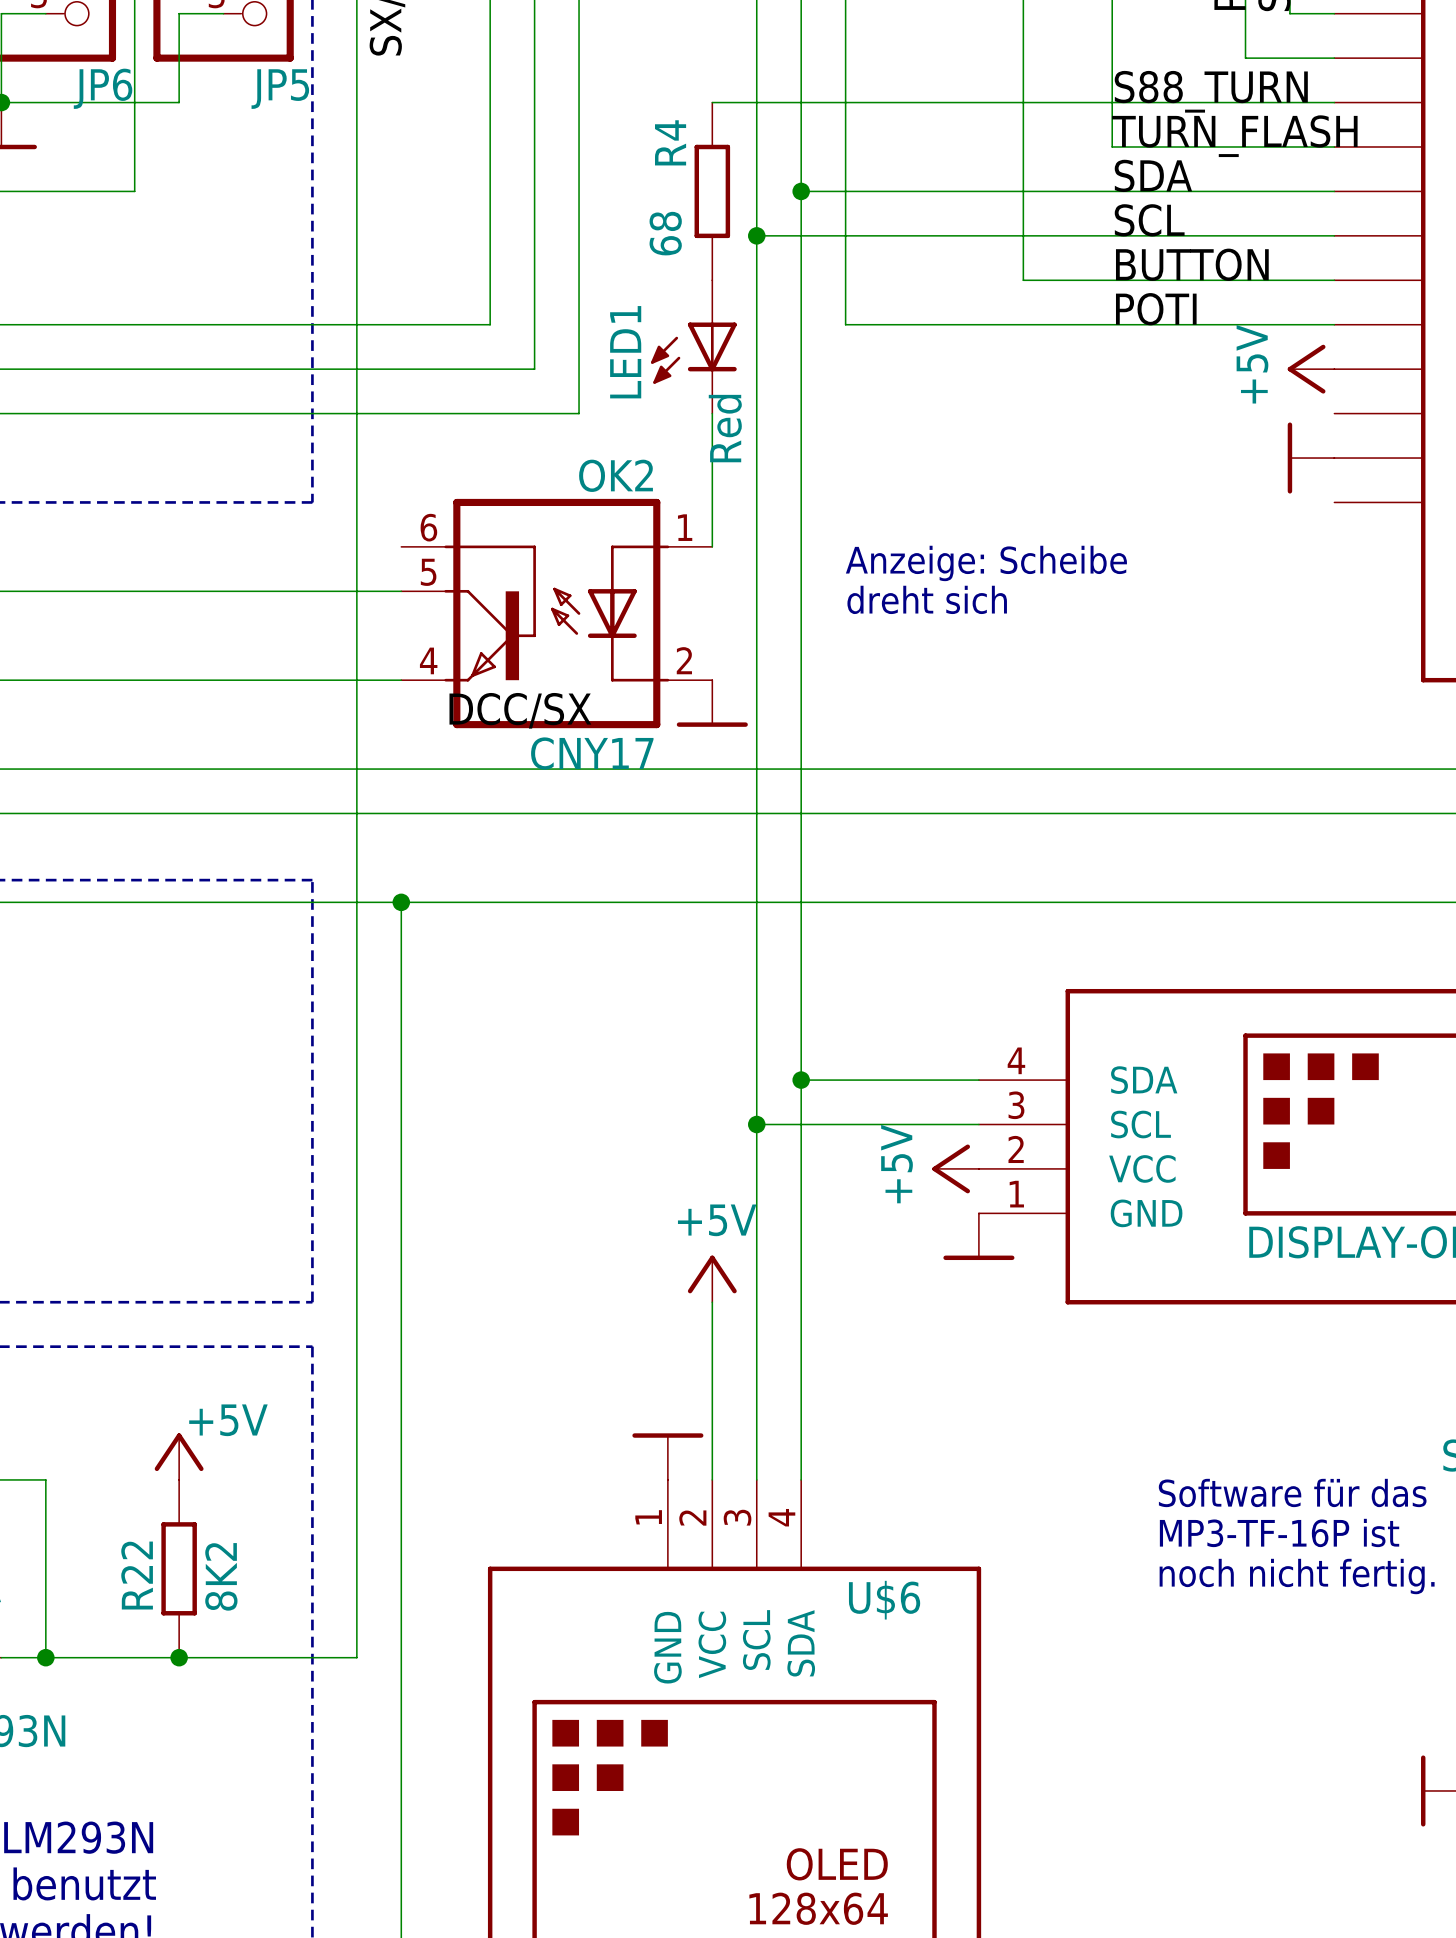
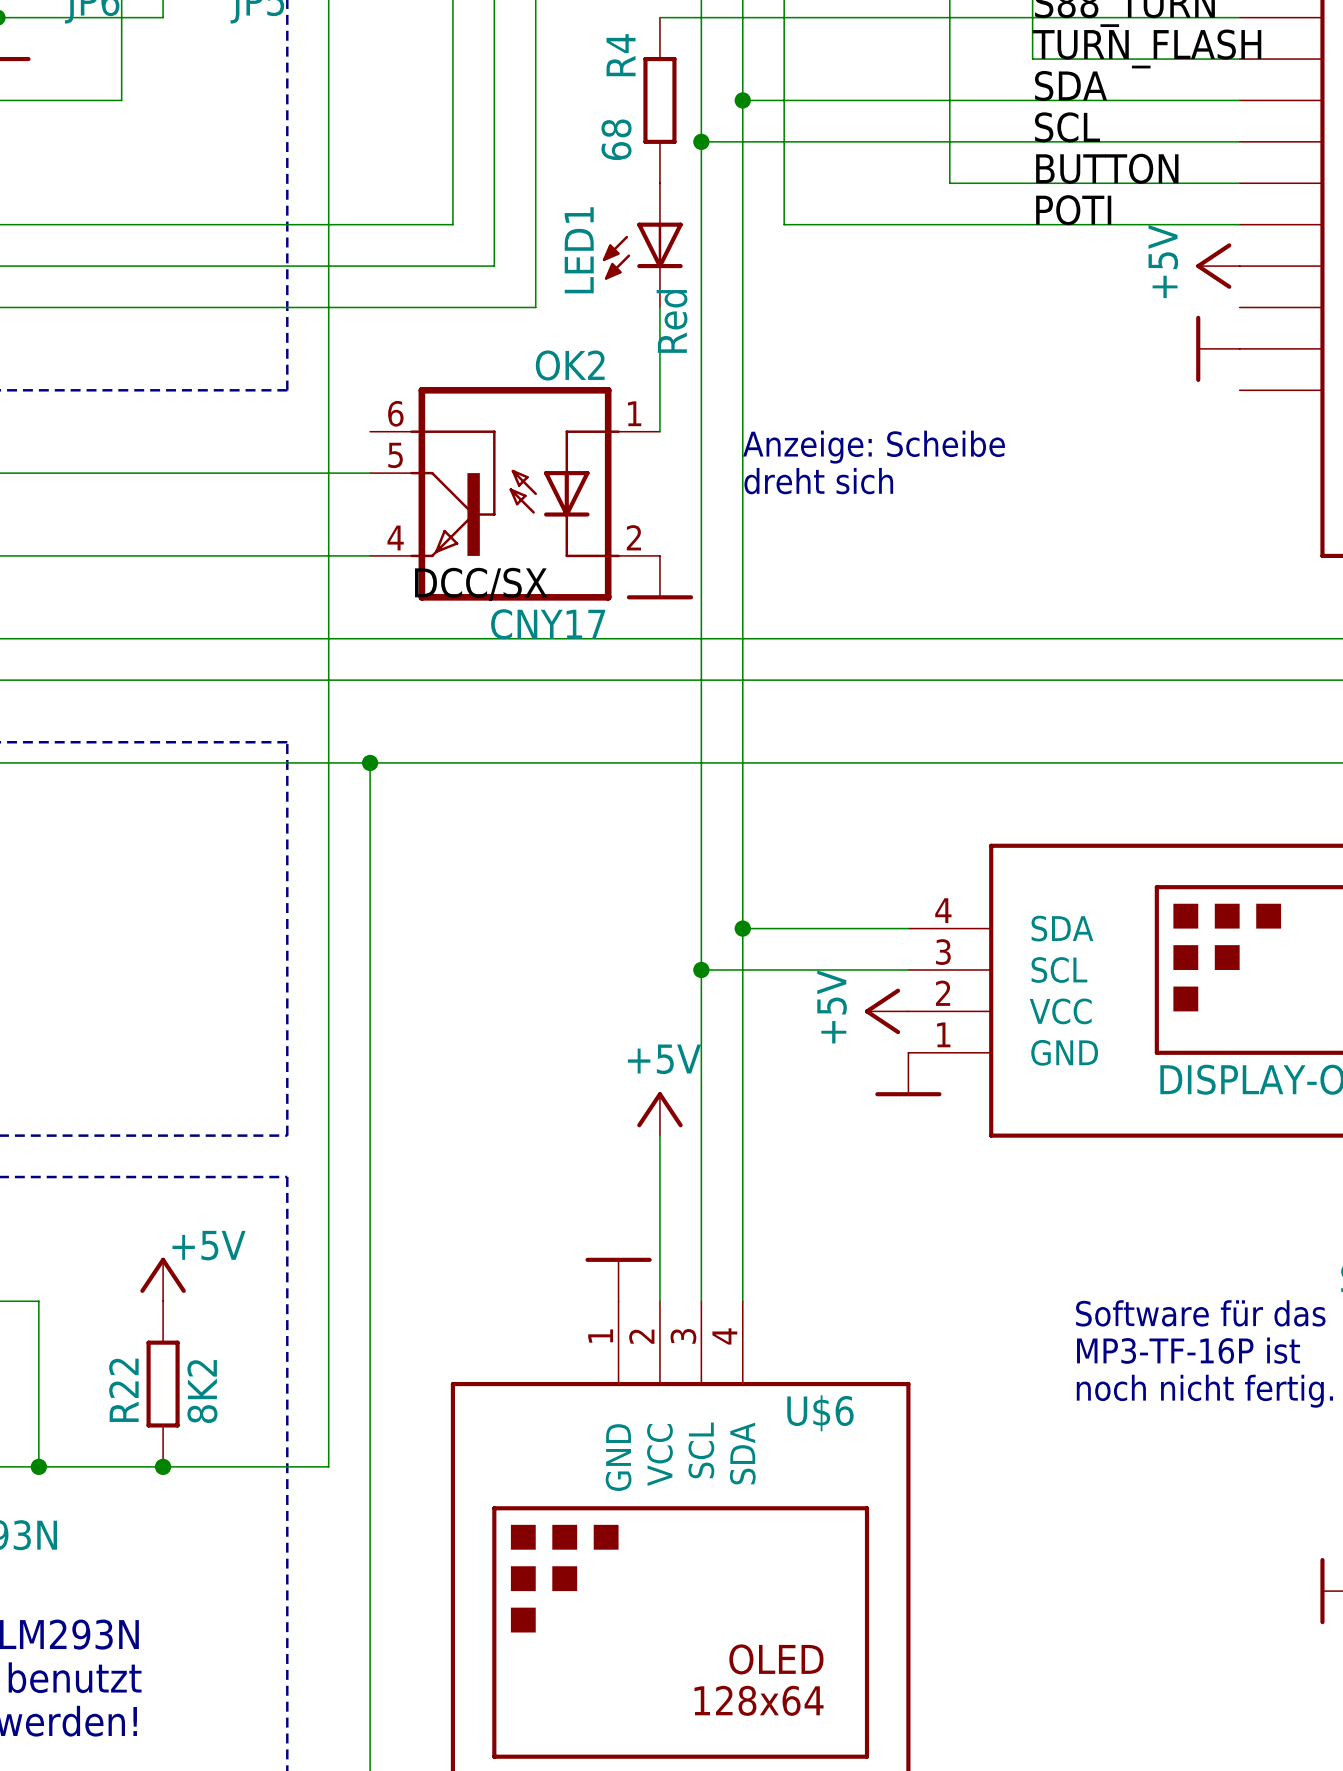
text position: Anzeige: Scheibe (986, 563) -> Anzeige: Scheibe (873, 447)
text position: dreht sich (927, 599) -> dreht sich (818, 481)

